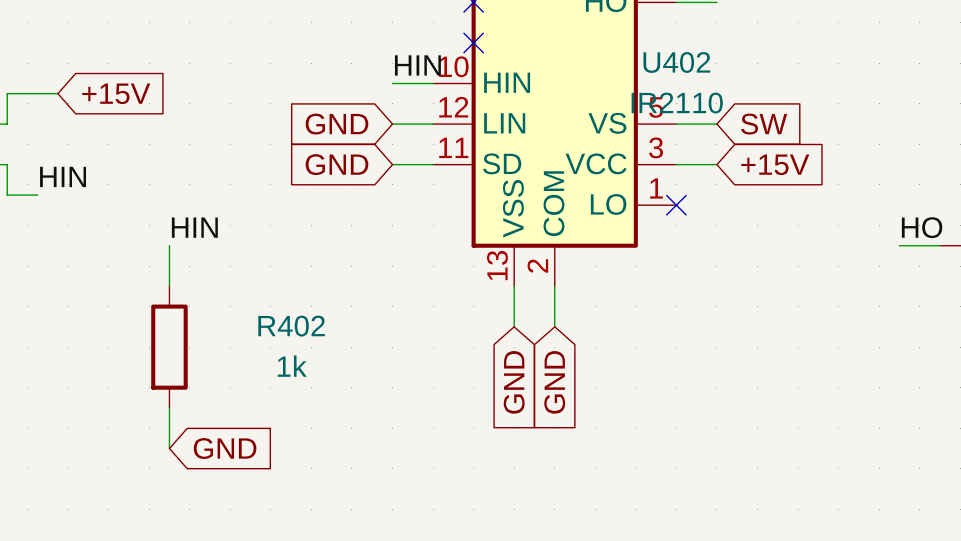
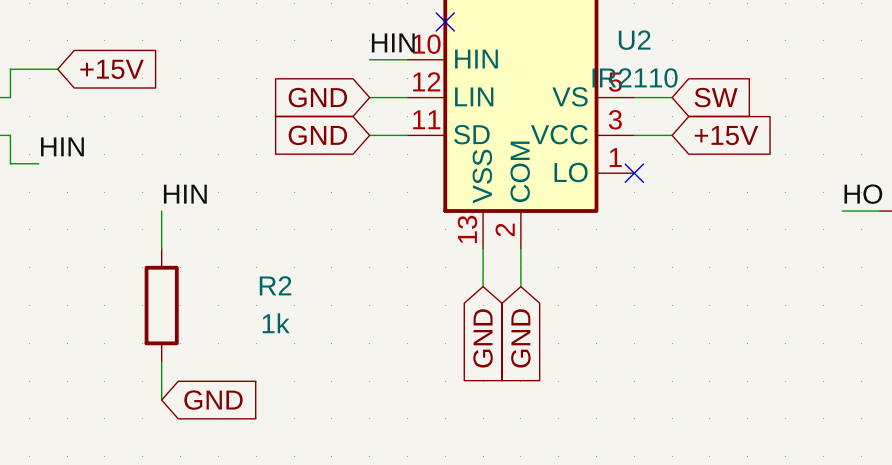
U402 name: U402 (676, 62) -> U2 (634, 40)
R402 name: R402 (291, 326) -> R2 (275, 285)

